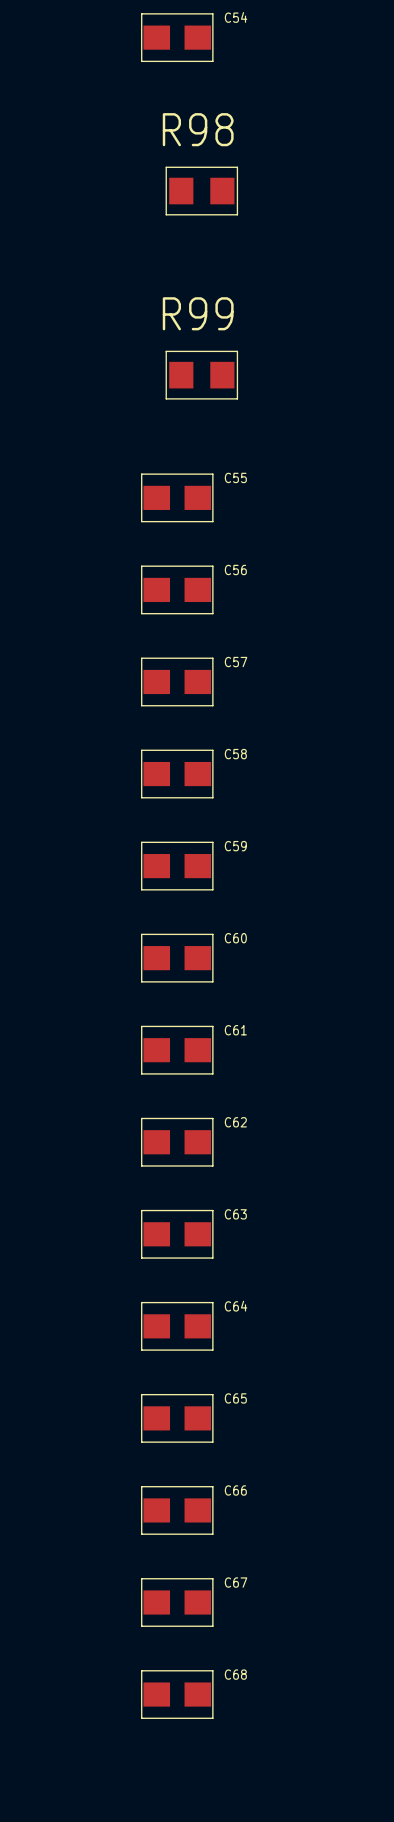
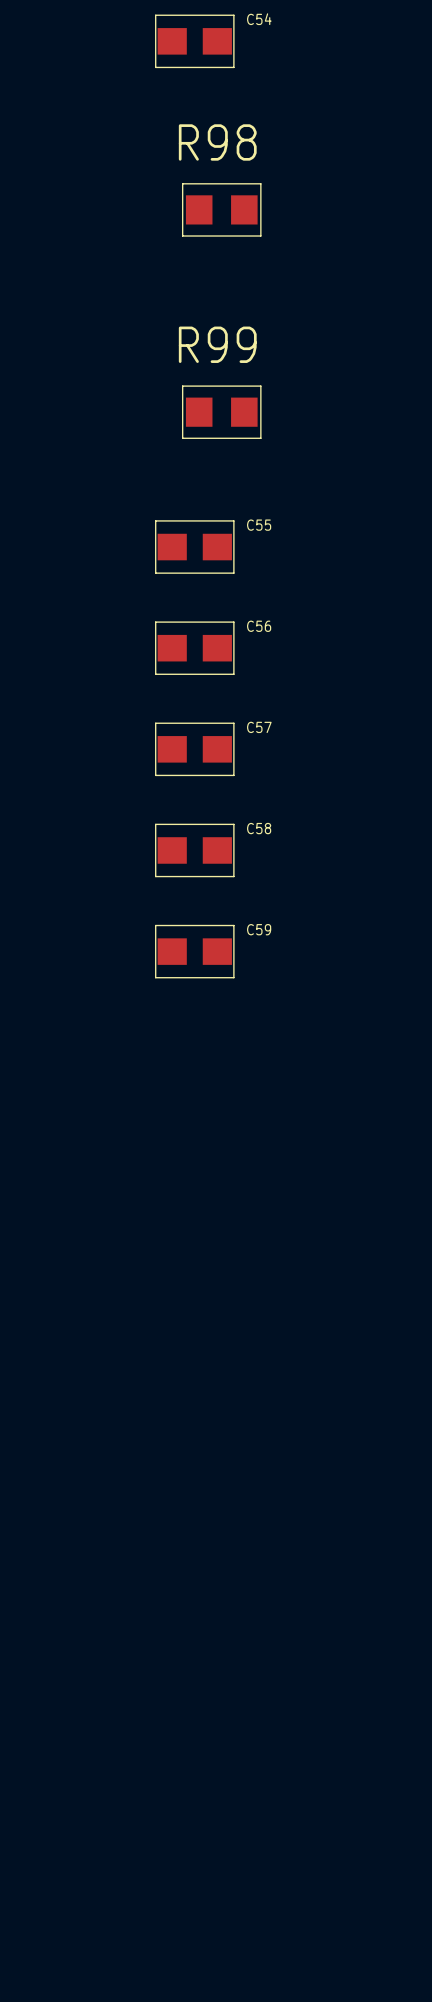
C60: (177, 958) -> none
C61: (177, 1050) -> none
C62: (177, 1142) -> none
C63: (177, 1234) -> none
C64: (177, 1326) -> none
C65: (177, 1418) -> none
C66: (177, 1510) -> none
C67: (177, 1602) -> none
C68: (177, 1694) -> none

